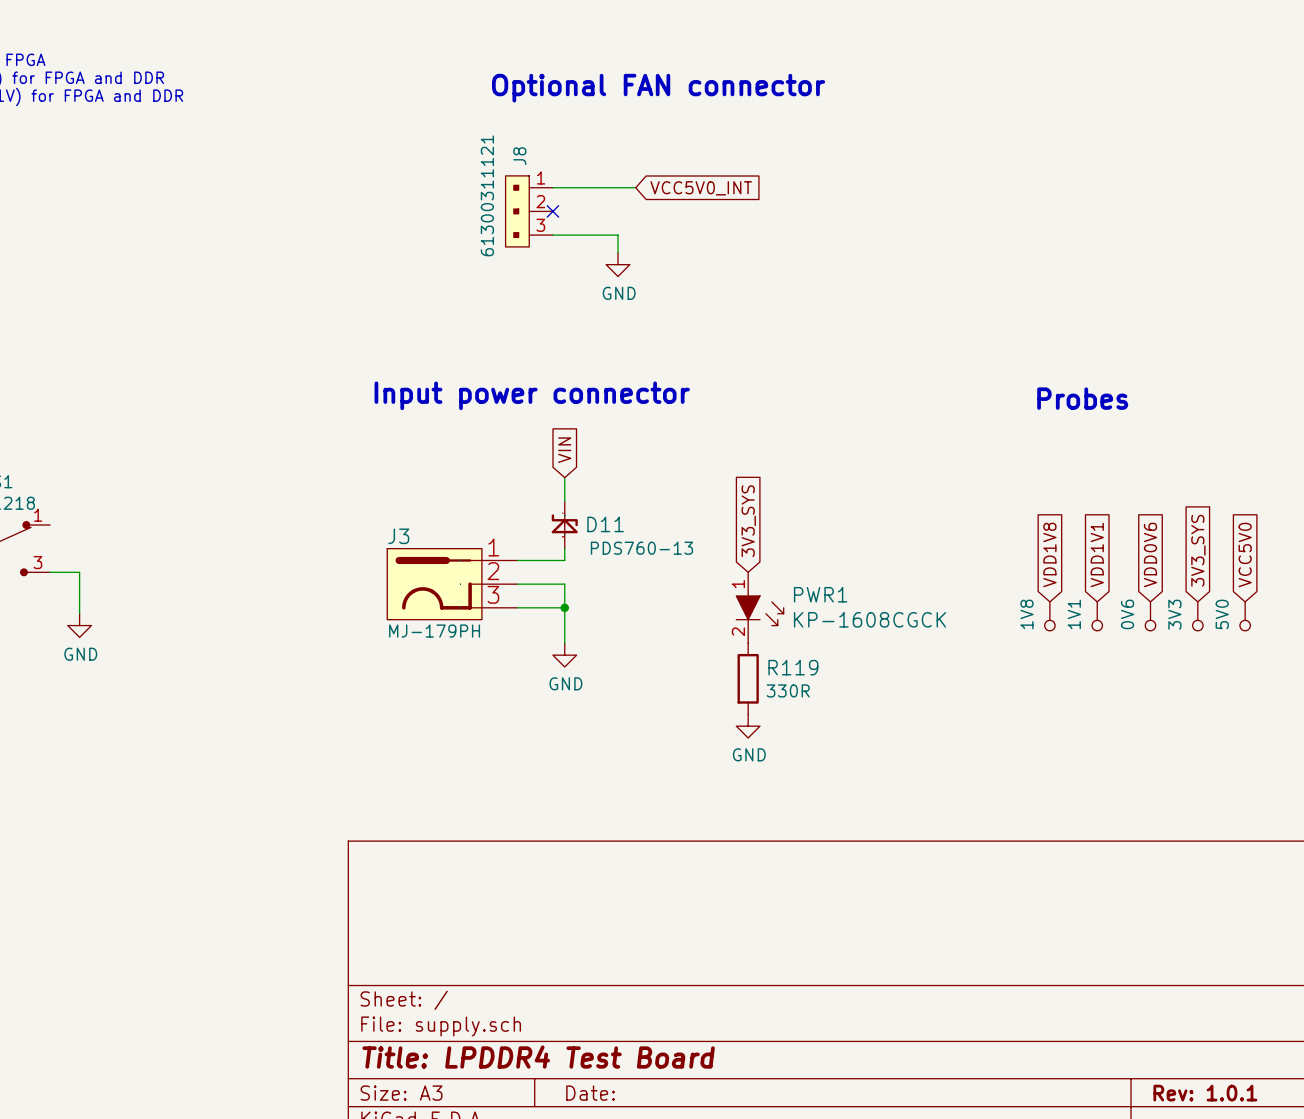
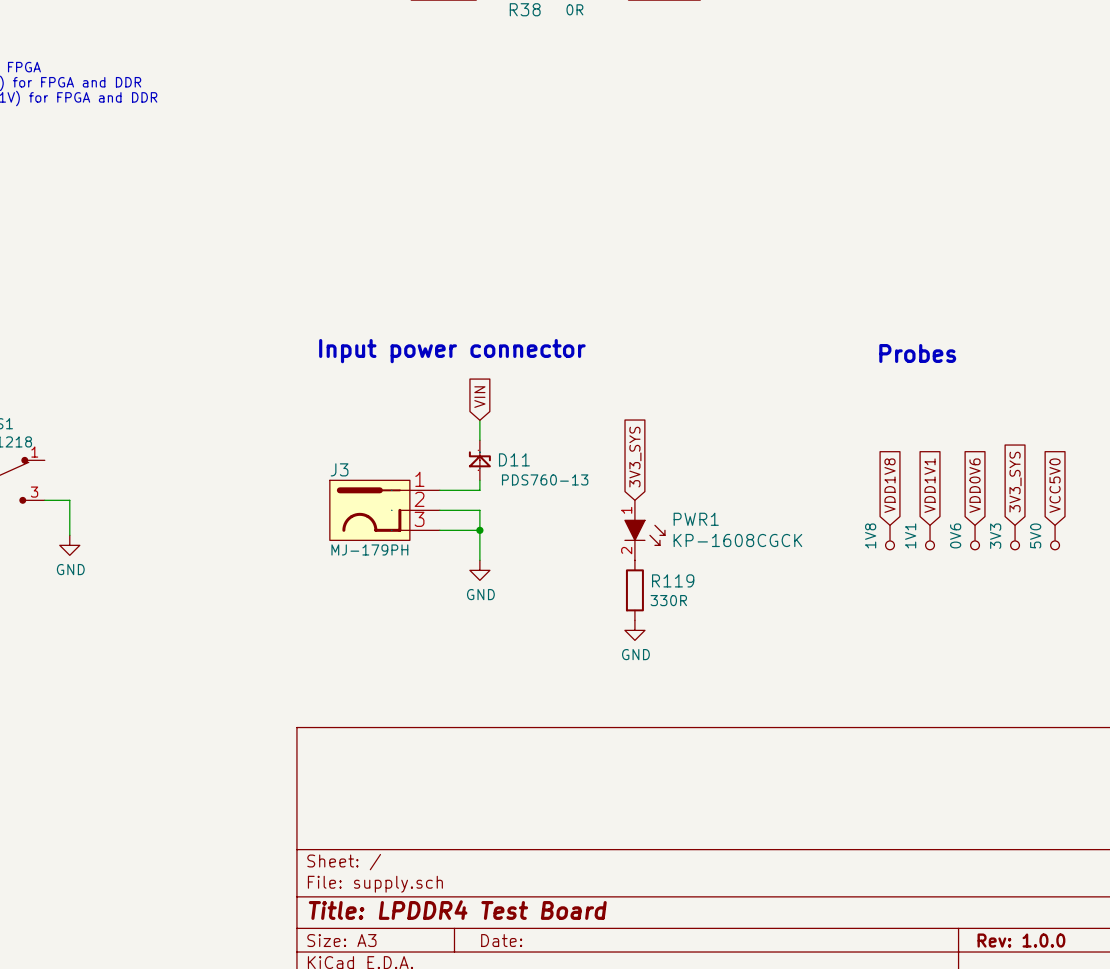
text: Optional FAN connector (658, 88) -> none
wire: (552, 187) (635, 187) -> none
global label: VCC5V0_INT (701, 188) -> none
J8: 61300311121 (529, 211) -> none
no-connect mark: (552, 211) -> none
wire: (552, 235) (618, 235) (618, 252) -> none
power symbol: GND (618, 264) -> none
title block: Rev: 1.0.1 (1205, 1093) -> Rev: 1.0.0 (1021, 940)

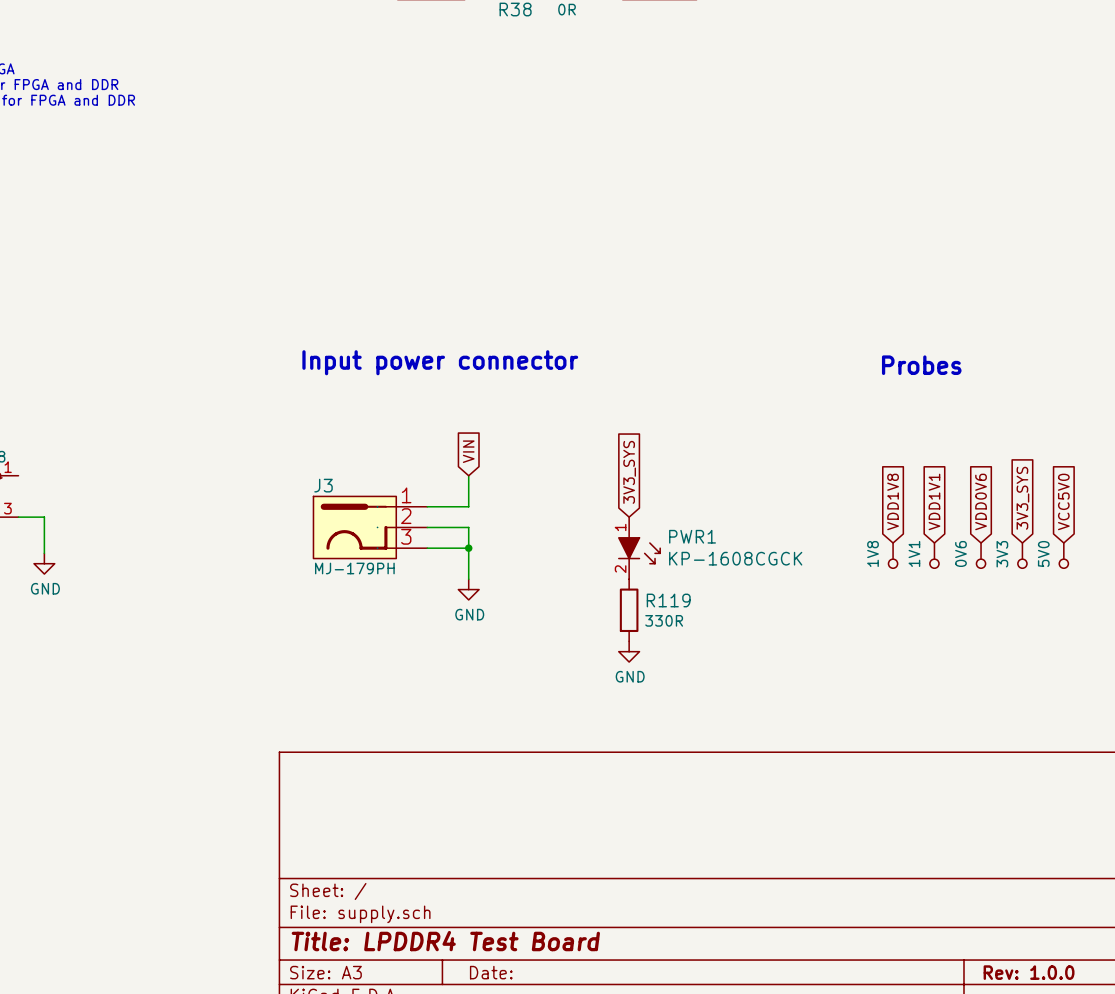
global label position: VIN (479, 397) -> VIN (468, 451)
D11: (479, 460) -> none

